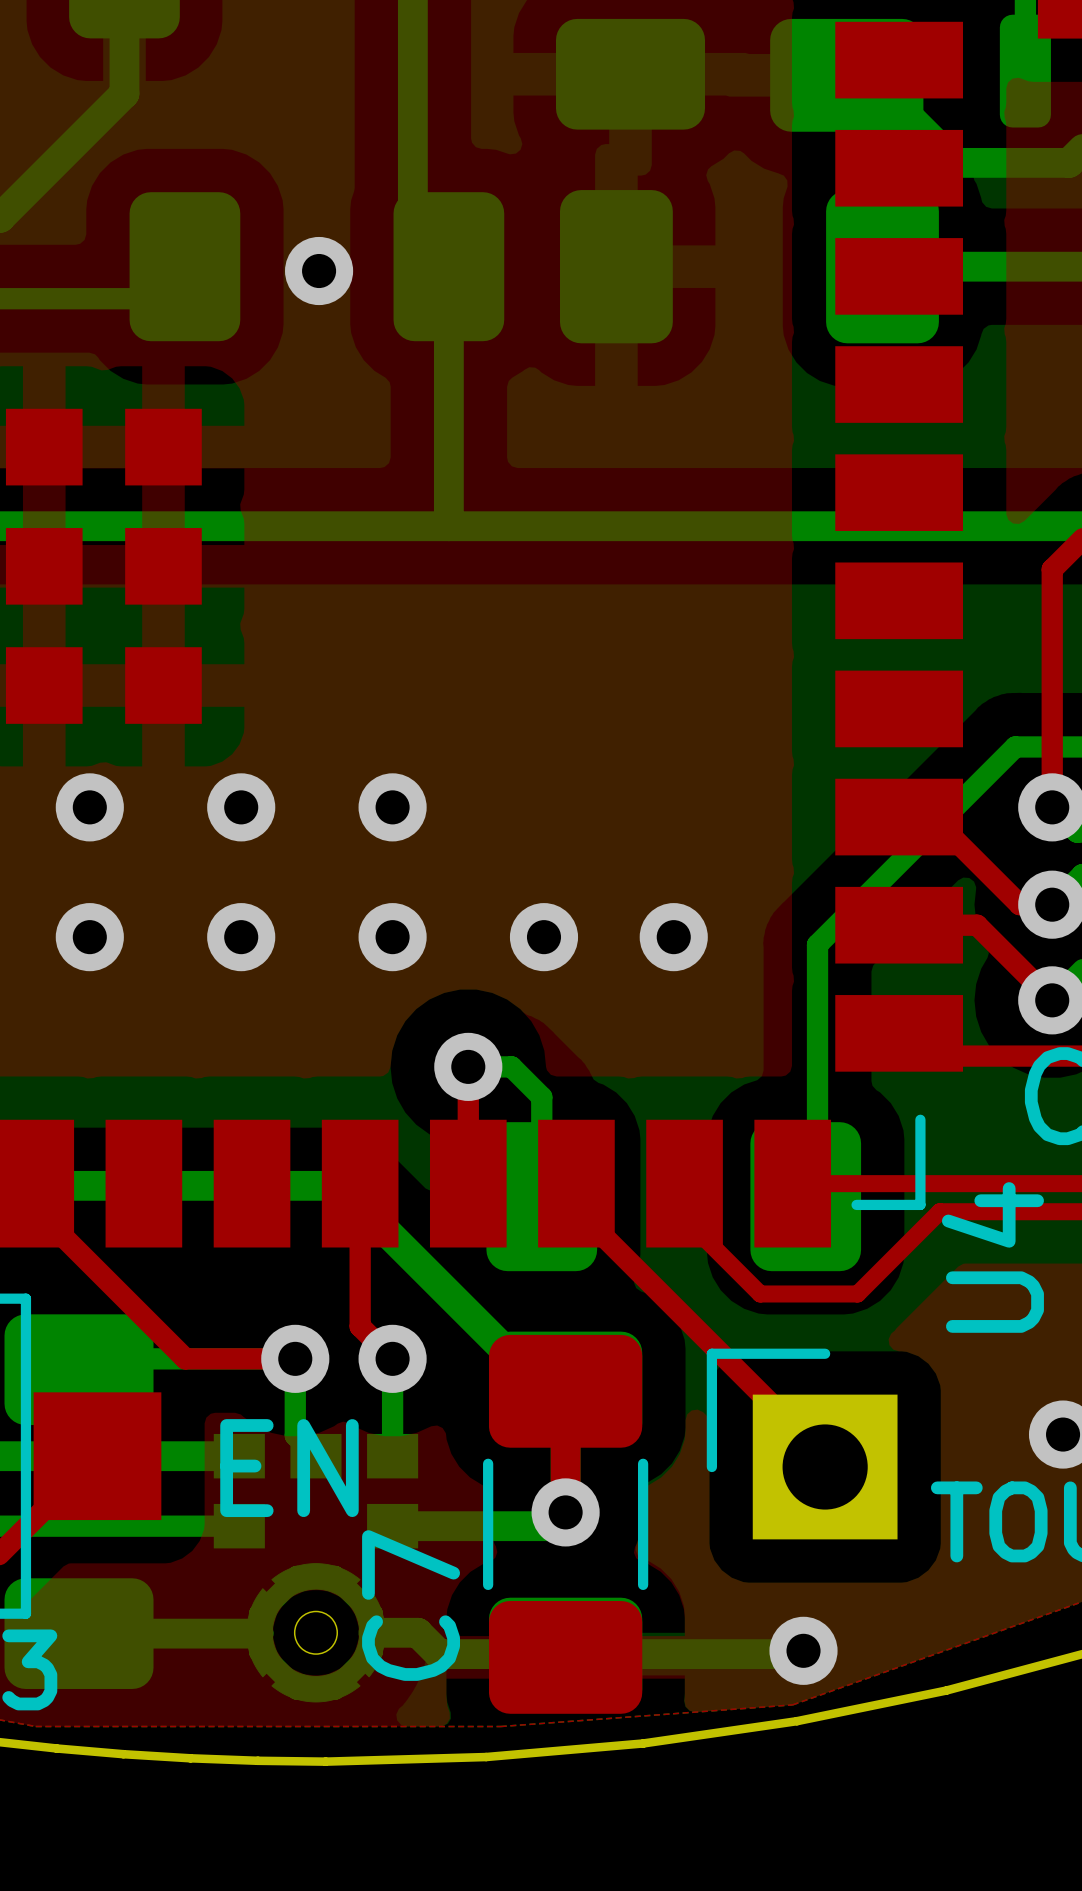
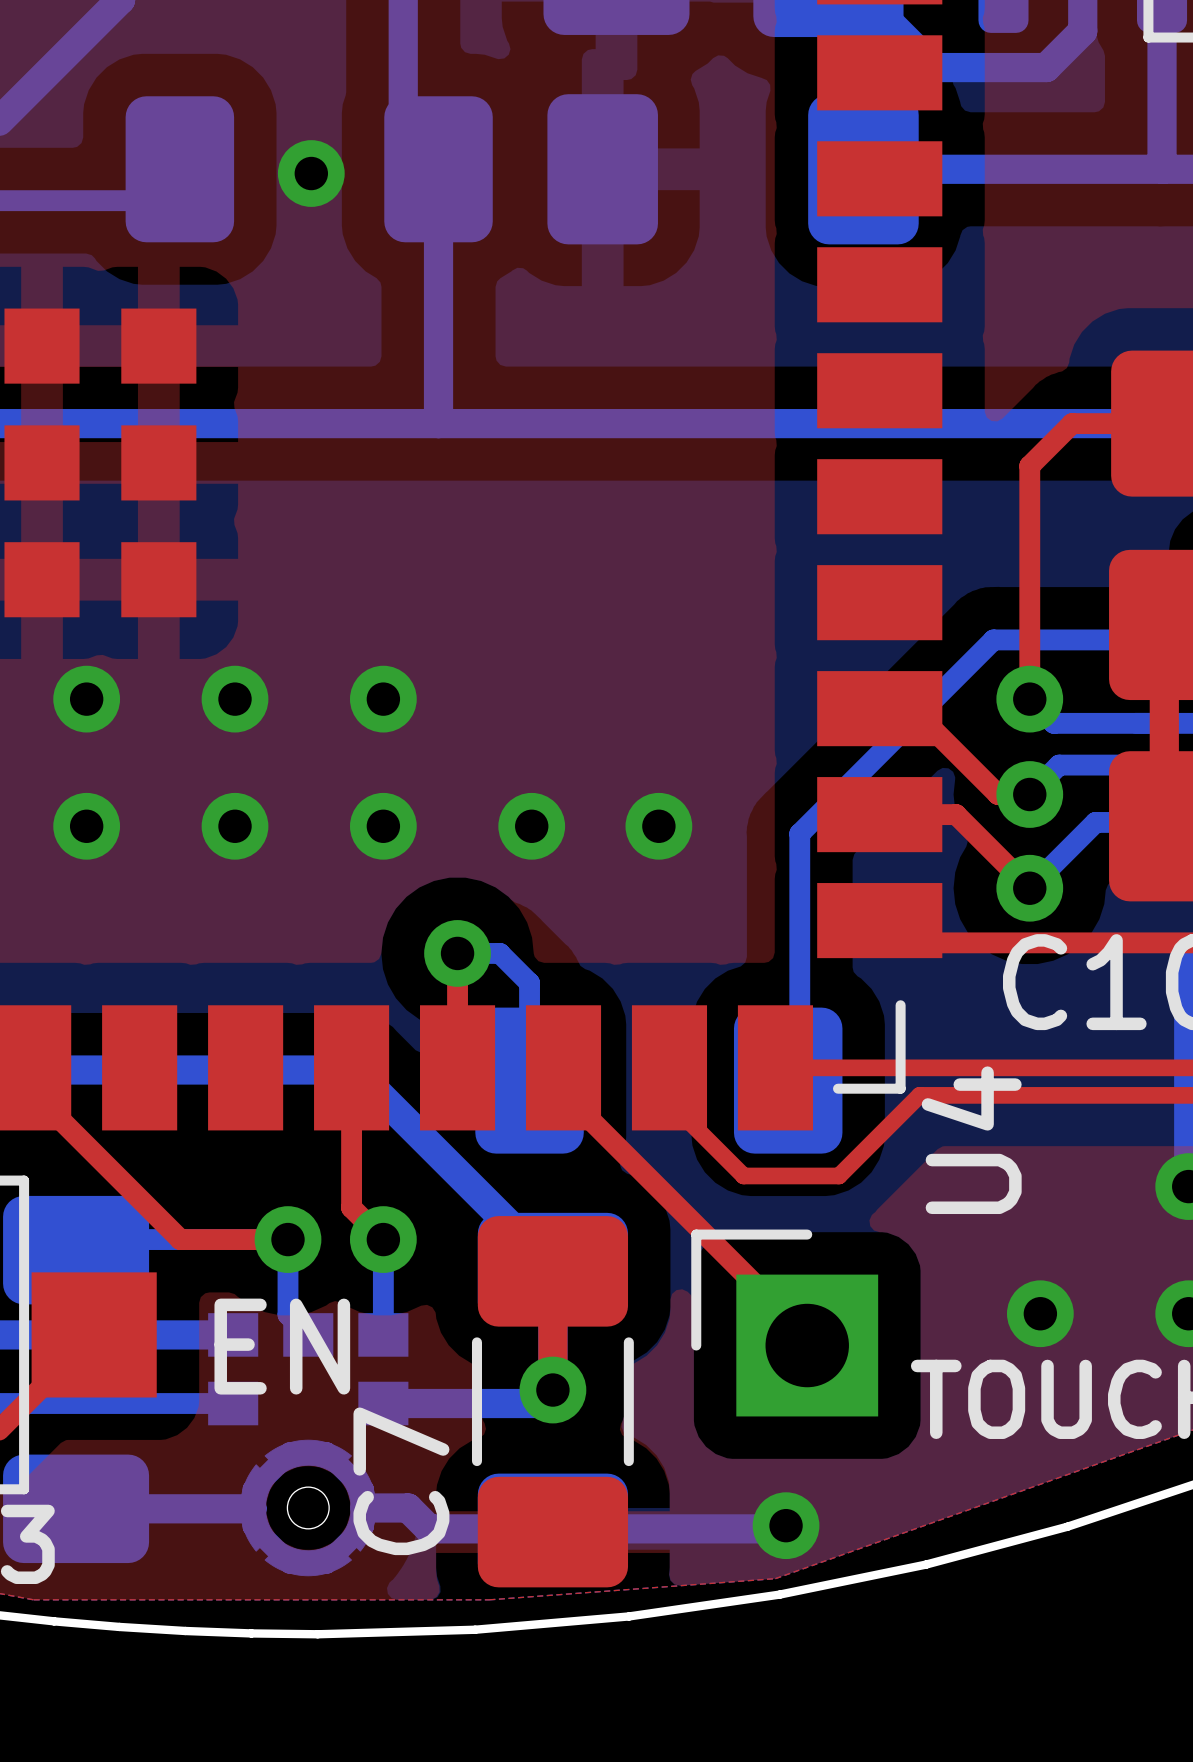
bottom track: (340, 1185) (542, 1388) (565, 1388) -> (332, 1070) (354, 1070) (552, 1268)

